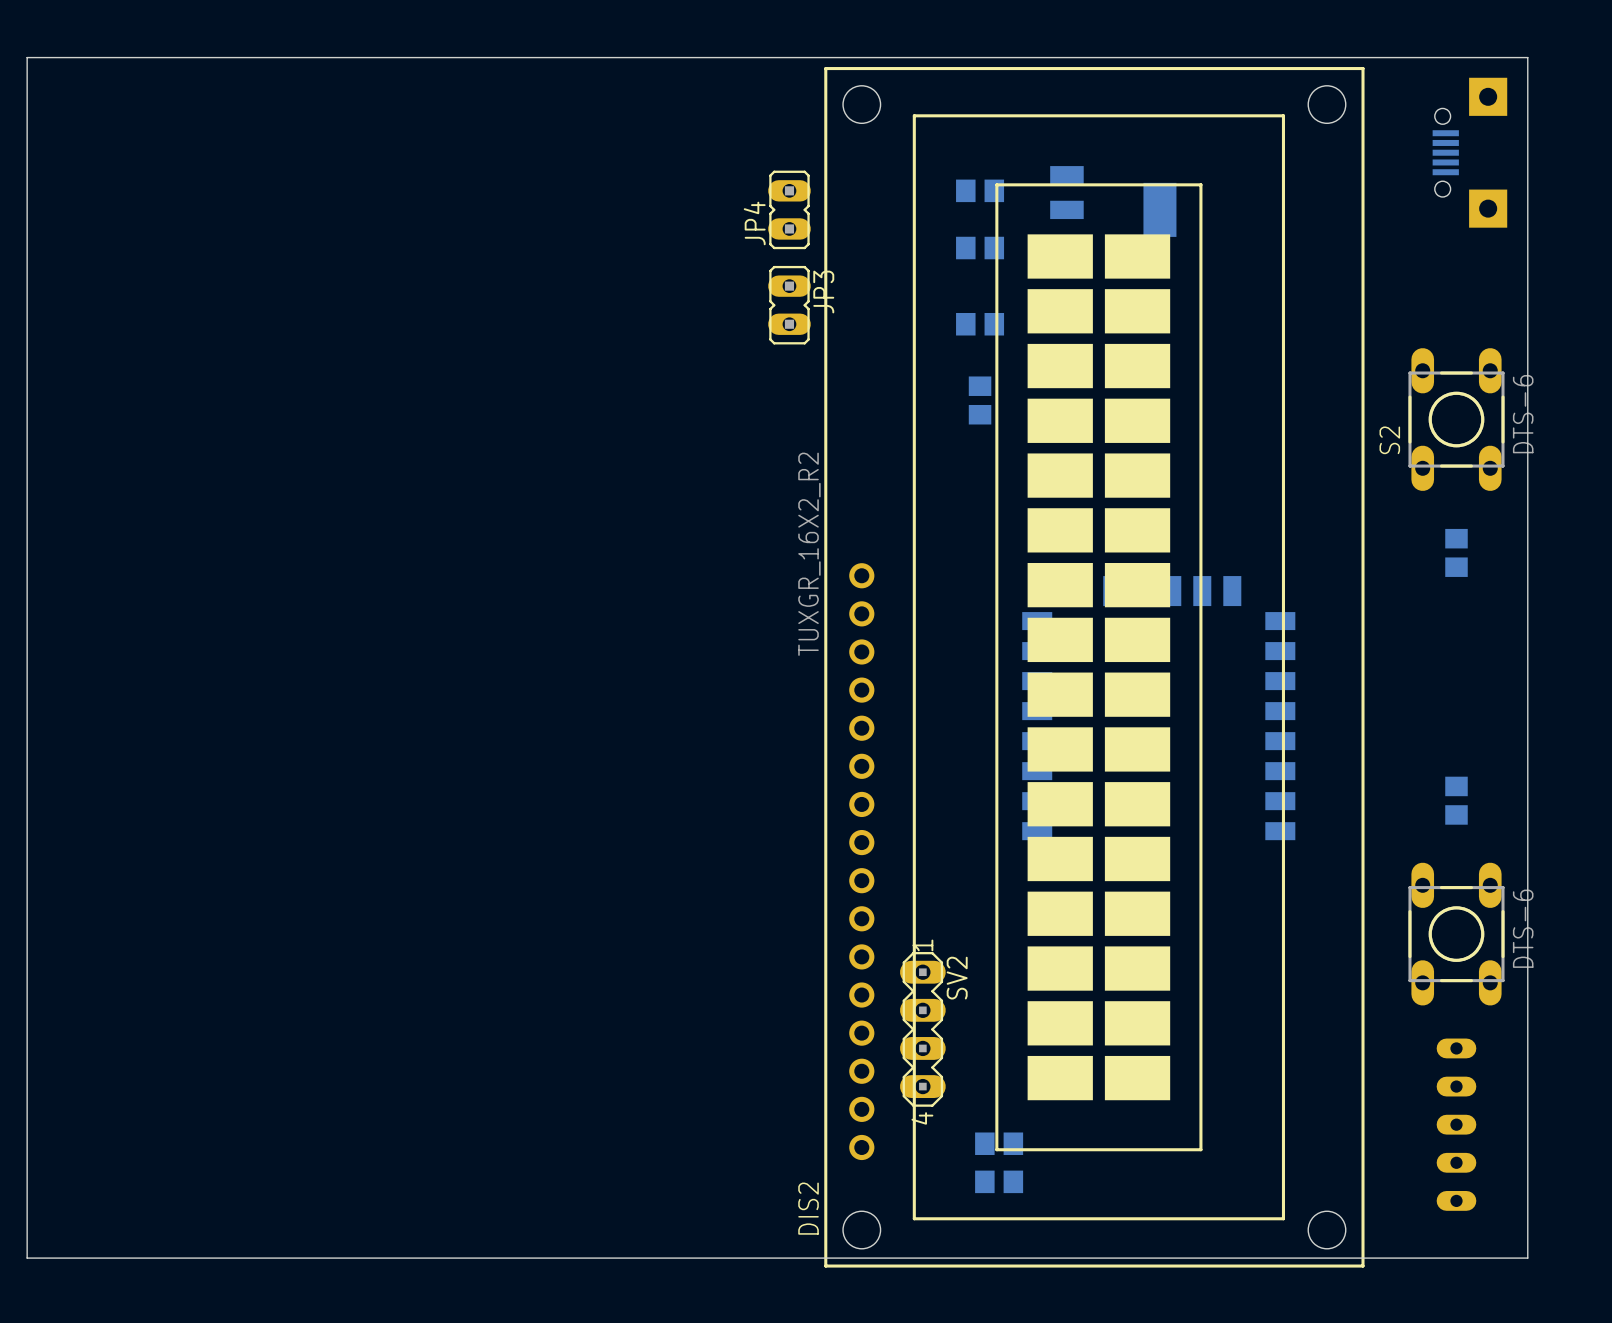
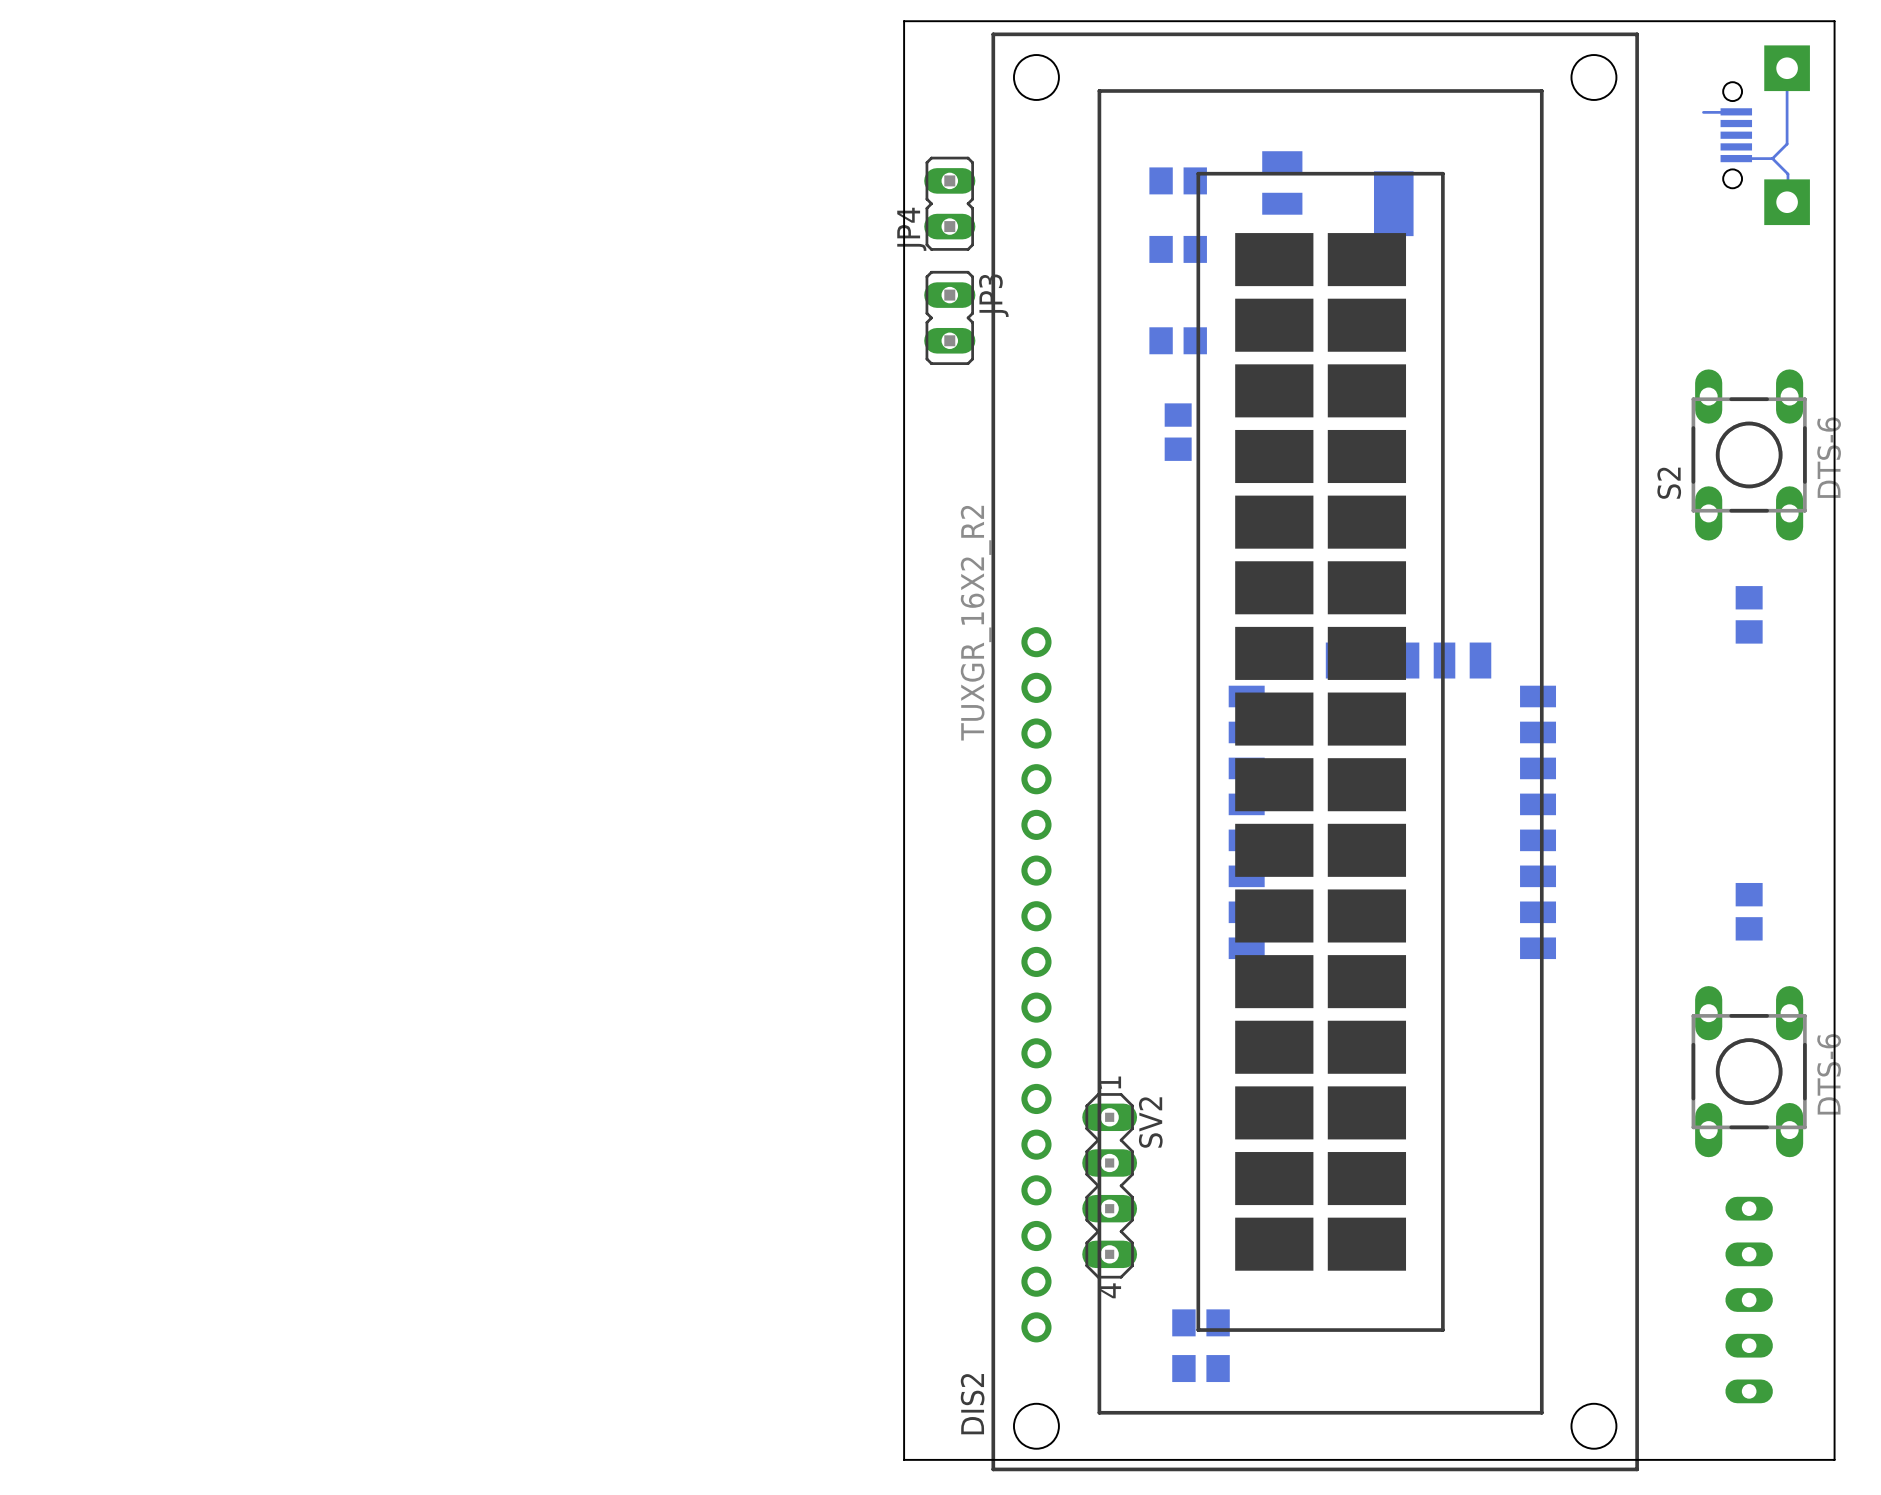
board edge: (751, 57) (27, 57) (27, 1258) (751, 1258) -> (904, 21) (904, 1459)
bottom track: none -> (1787, 68) (1787, 144) (1772, 158)
bottom track: none -> (1736, 111) (1703, 112)
bottom track: none -> (1736, 158) (1772, 158)
bottom track: none -> (1772, 158) (1787, 174) (1787, 202)

